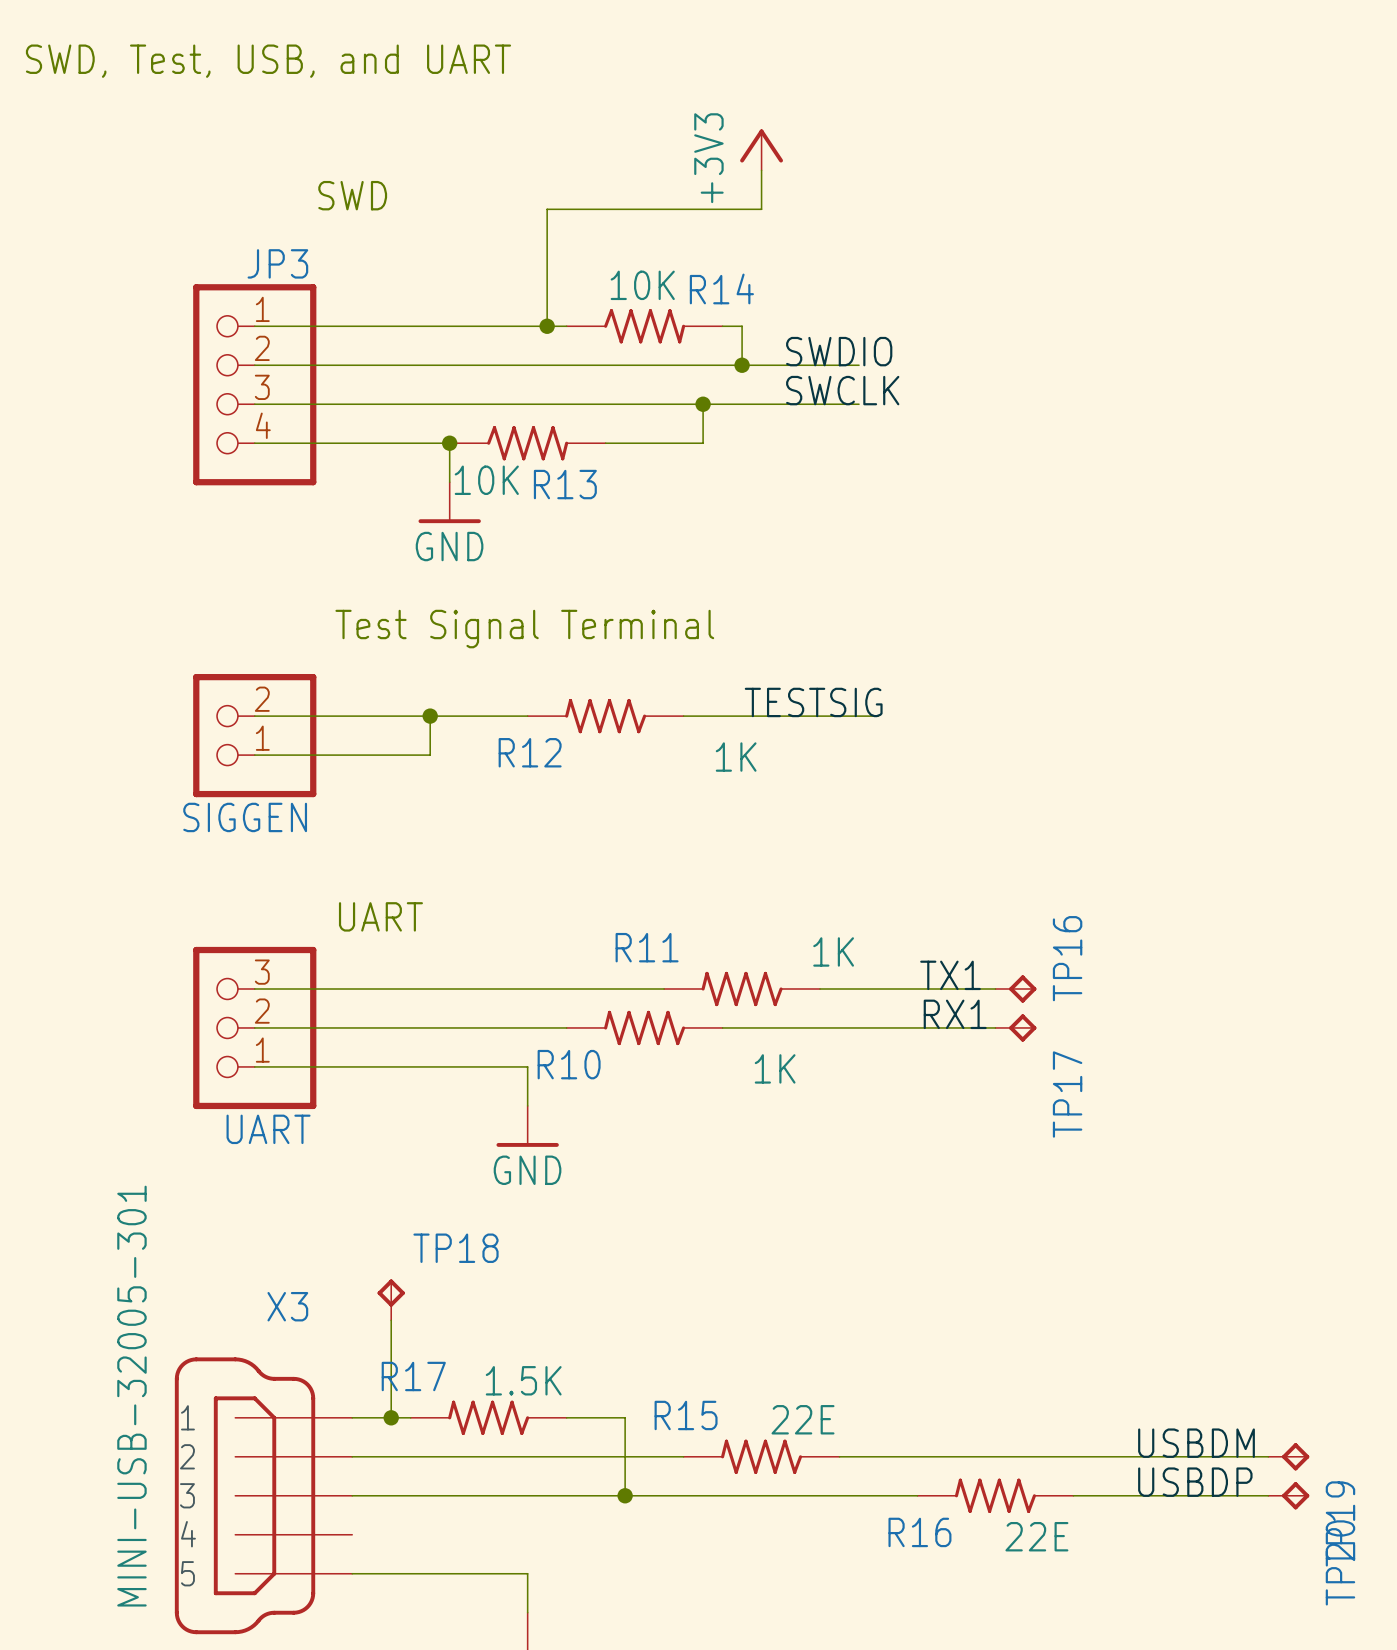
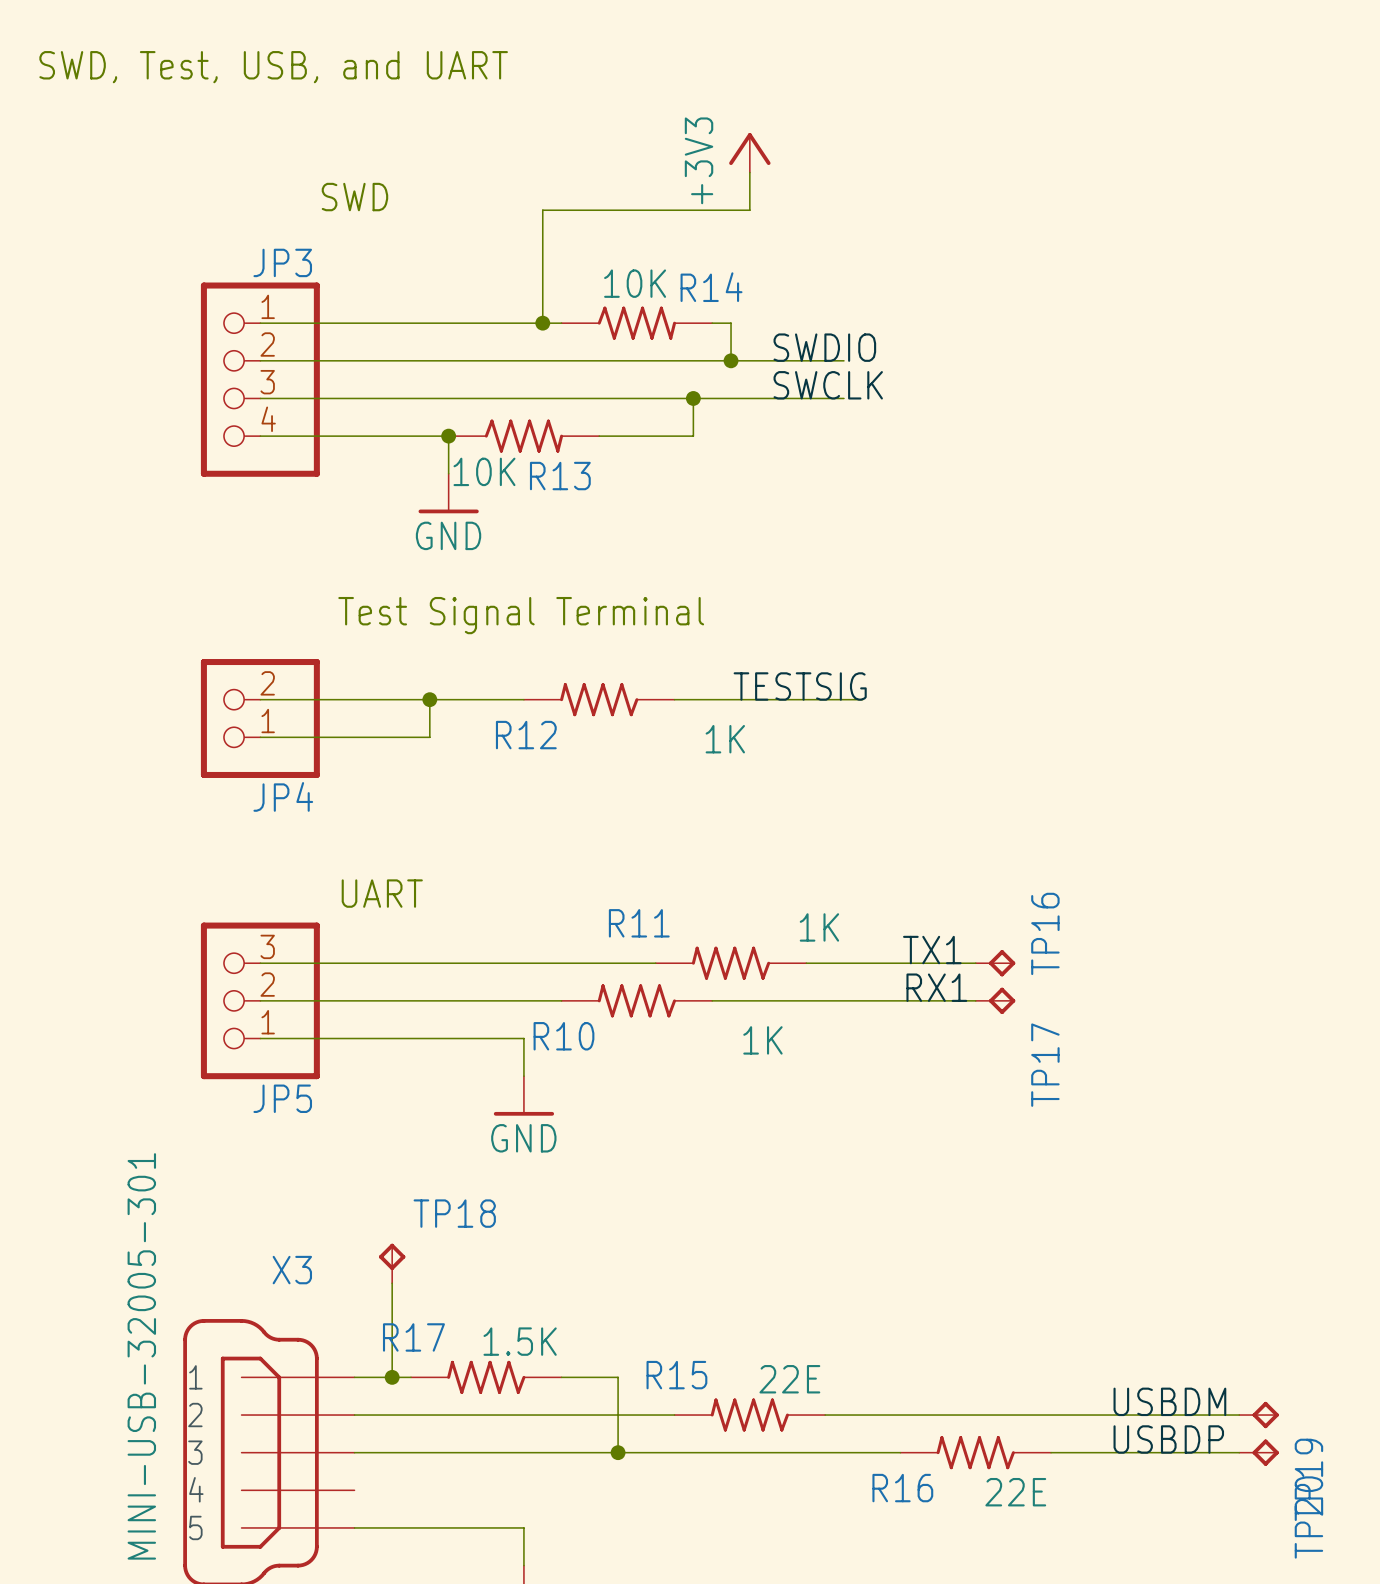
SIGGEN name: SIGGEN (245, 817) -> JP4 (283, 796)
UART name: UART (268, 1129) -> JP5 (282, 1098)

